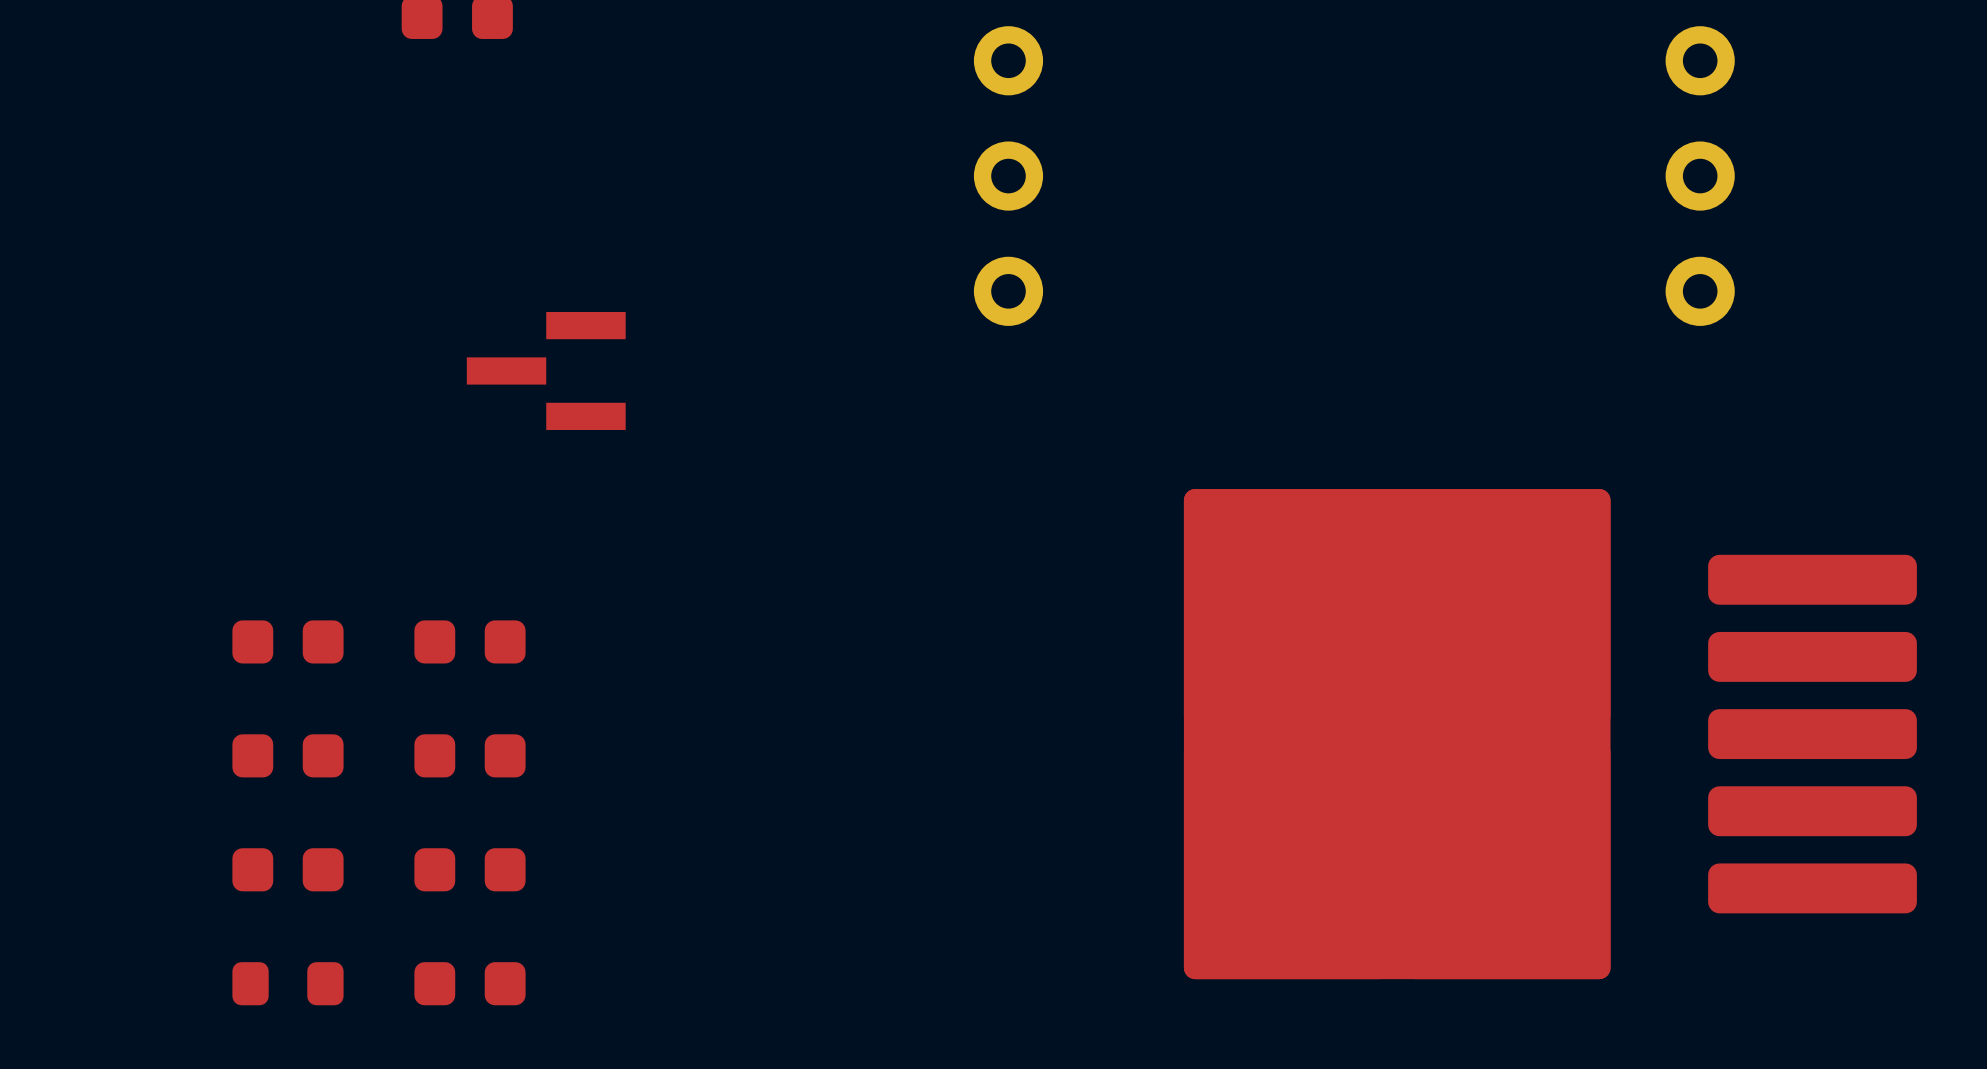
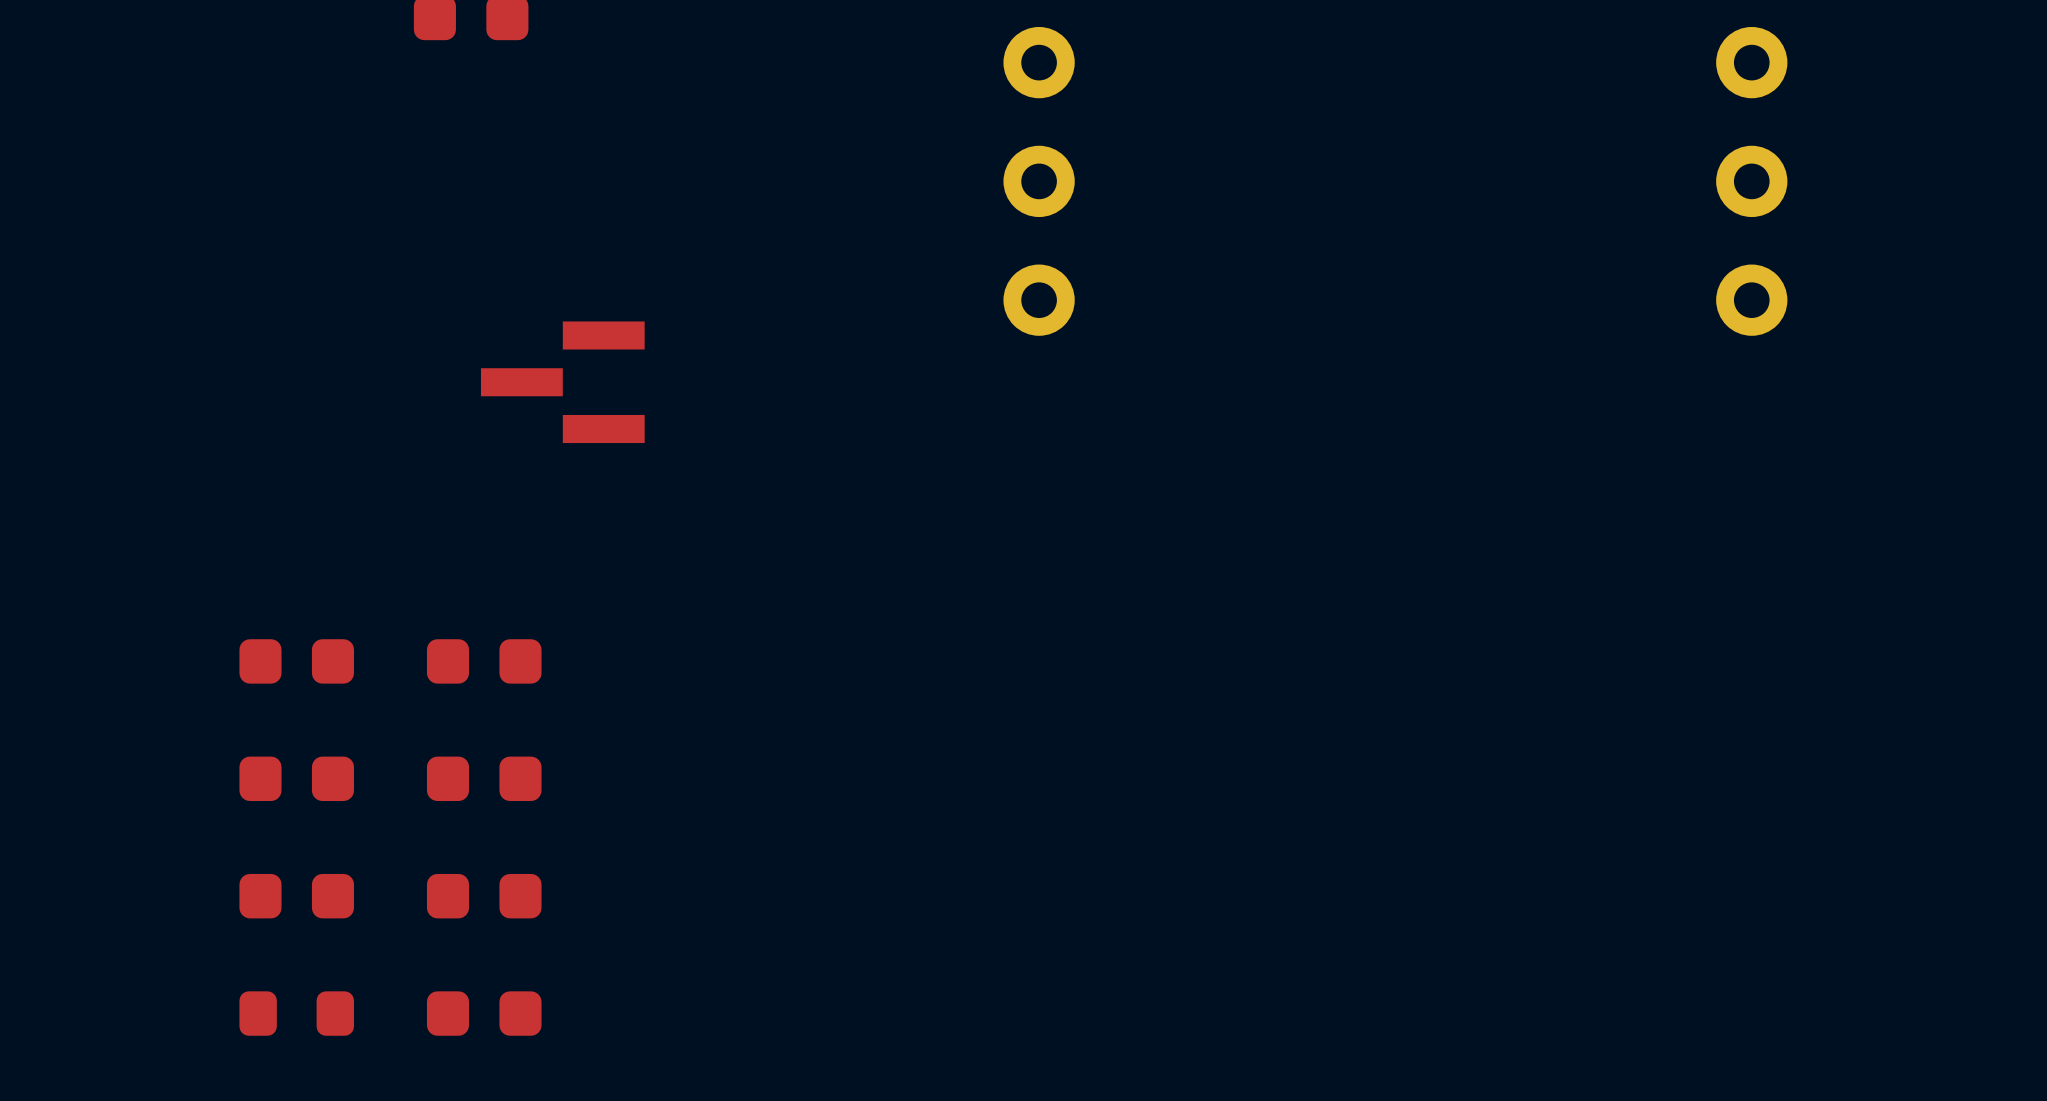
part: (1550, 734) -> none

